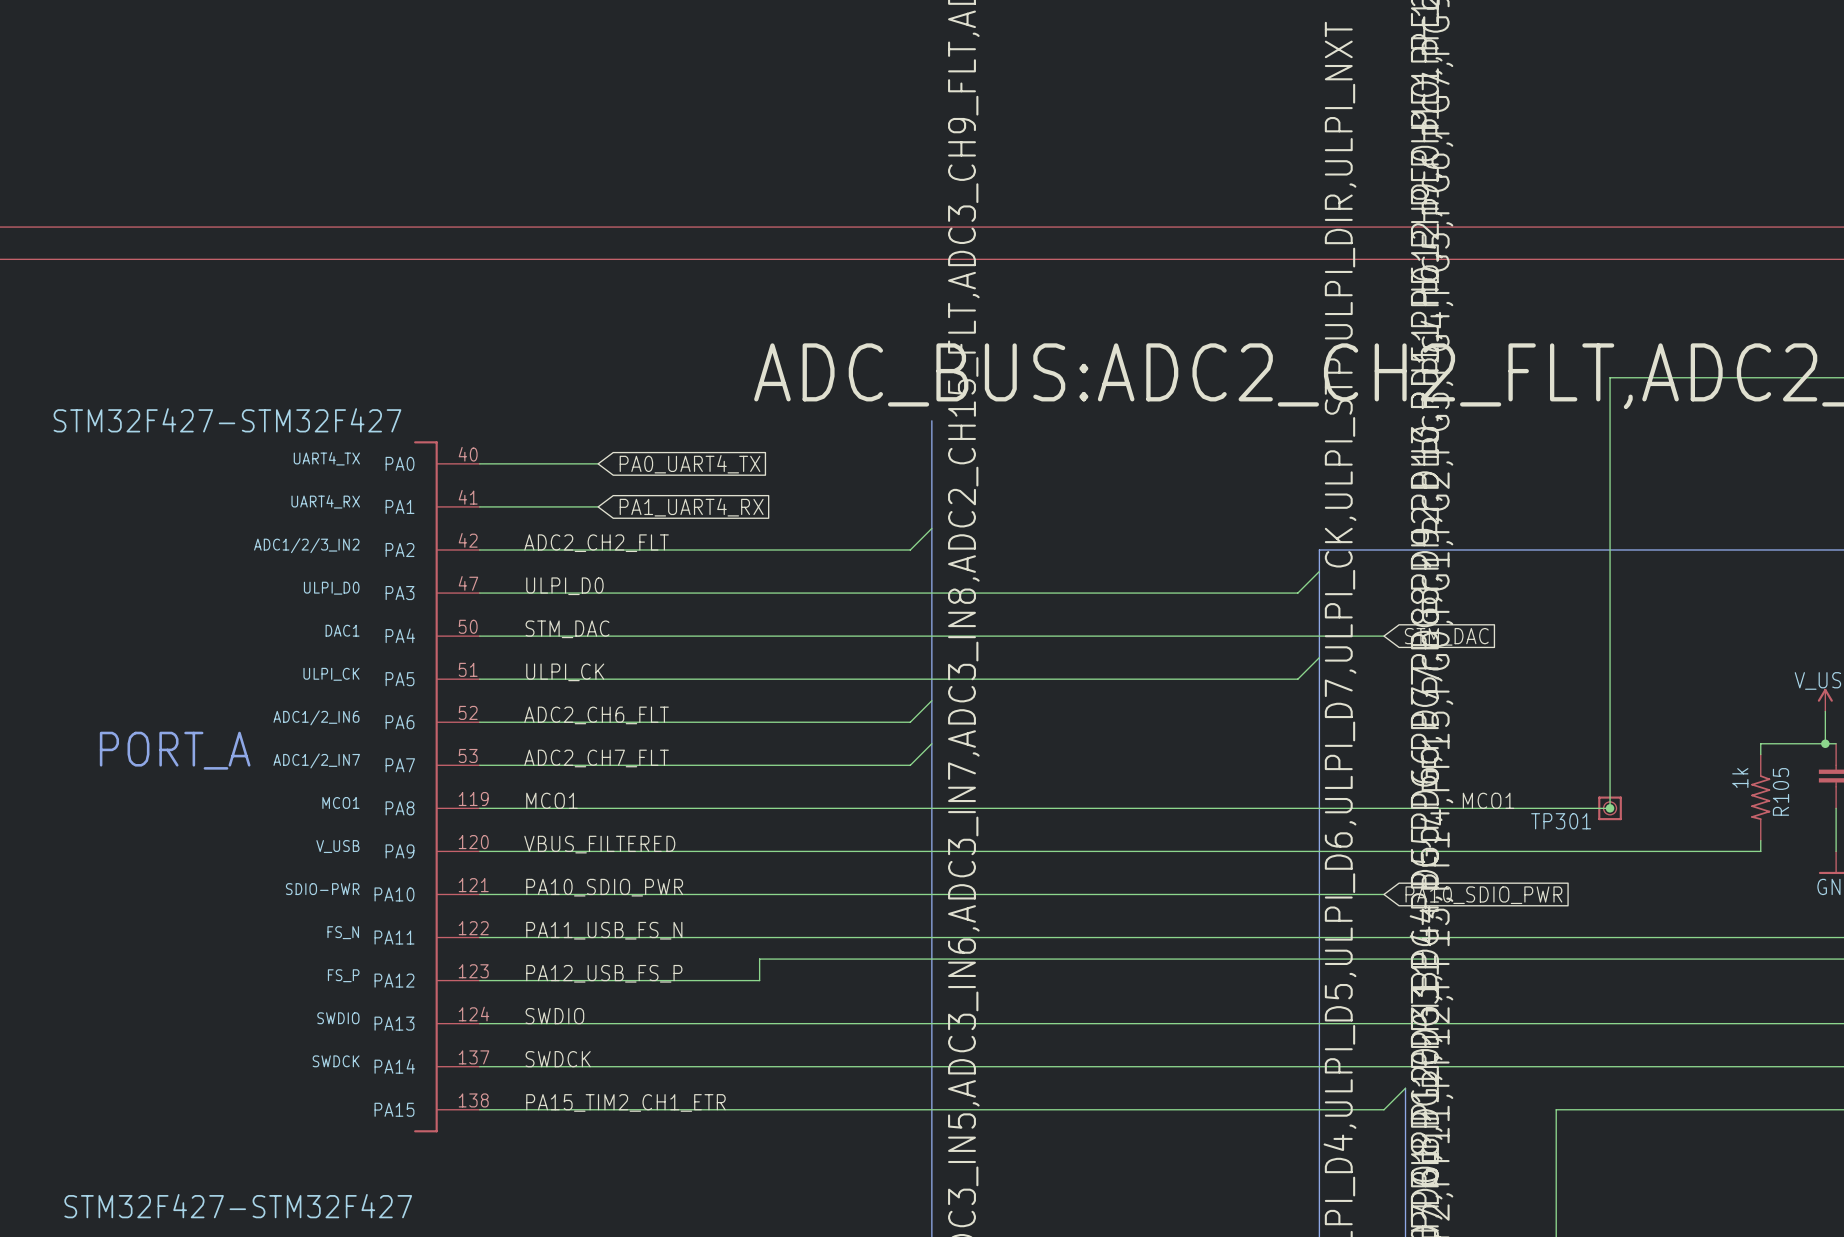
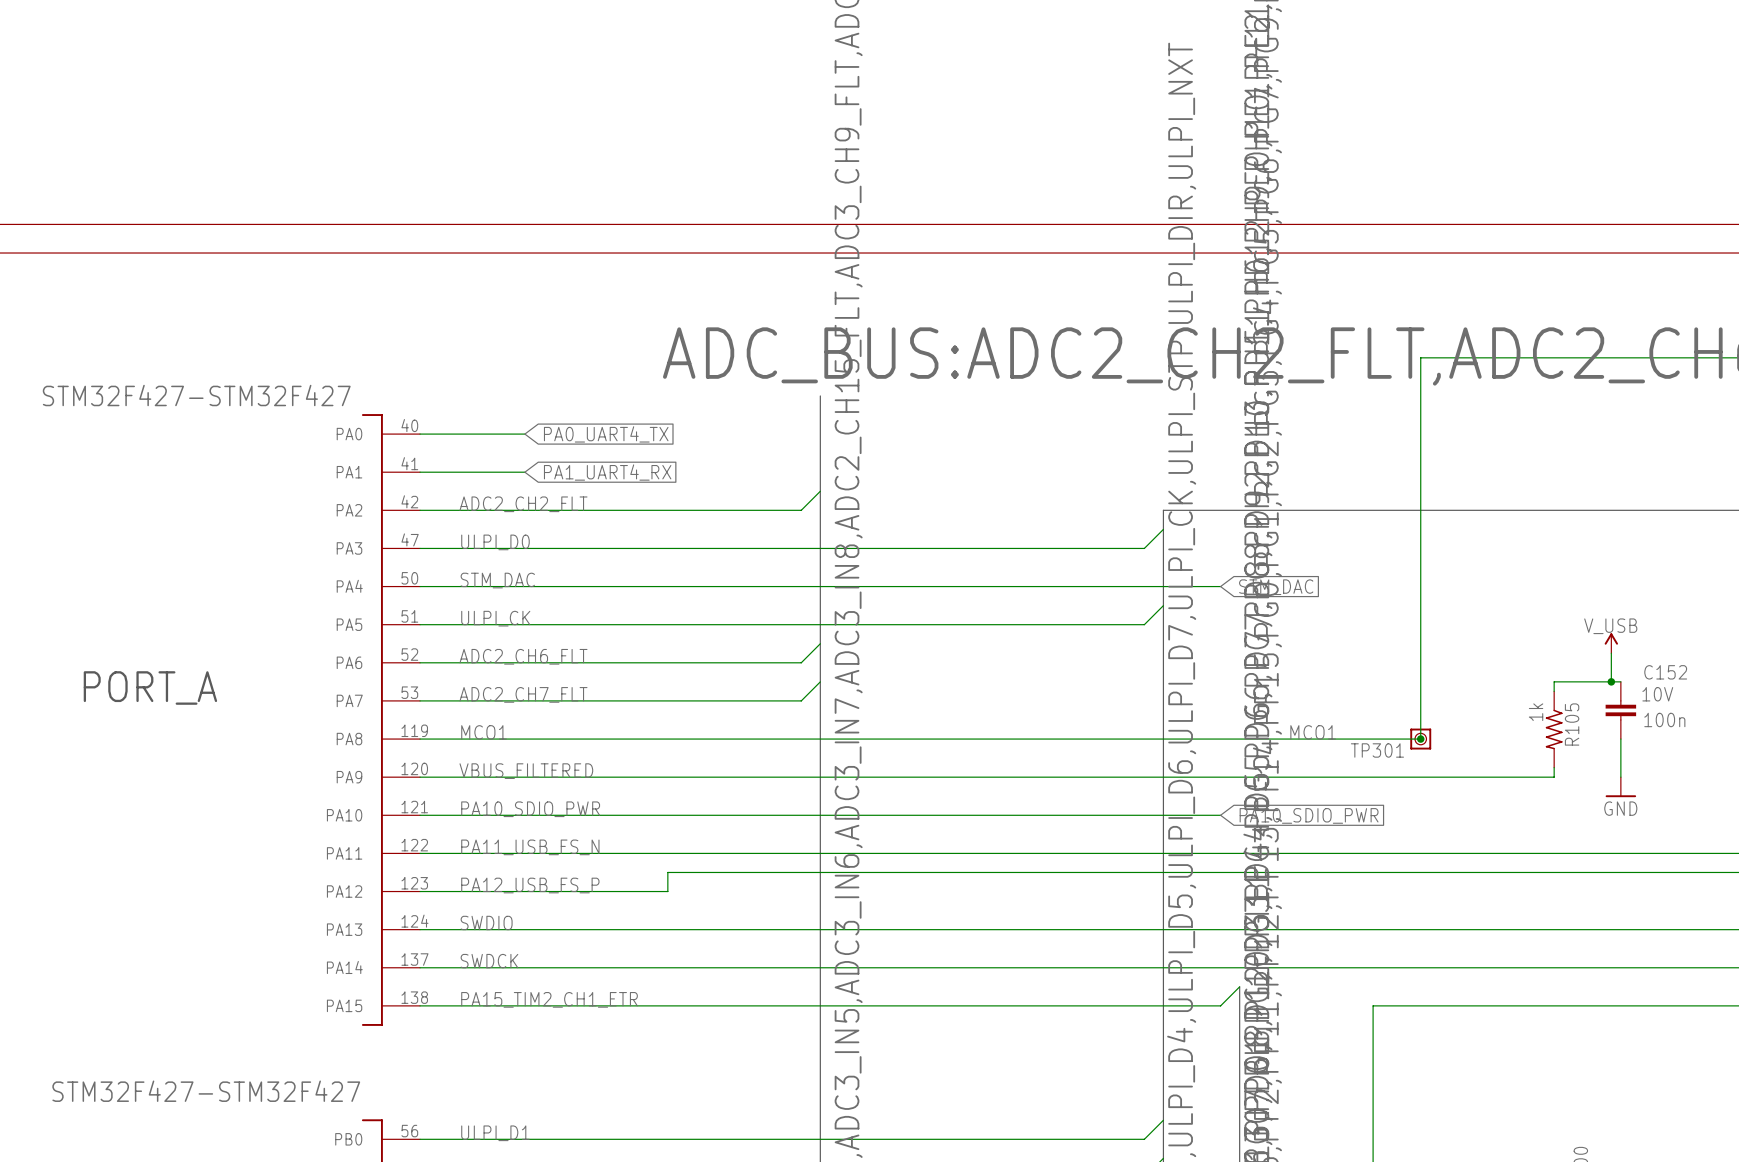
part text: UART4_TX (326, 458) -> none
part text: UART4_RX (325, 501) -> none
part text: ADC1/2/3_IN2 (306, 545) -> none
part text: ULPI_D0 (331, 588) -> none
part text: DAC1 (342, 630) -> none
part text: ULPI_CK (331, 674) -> none
part text: ADC1/2_IN6 (316, 717) -> none
part text: ADC1/2_IN7 (316, 760) -> none
part text: MCO1 (340, 802) -> none
part text: V_USB (337, 846) -> none
part text: SDIO-PWR (322, 889) -> none
part text: FS_N (343, 932) -> none
part text: FS_P (343, 975) -> none
part text: SWDIO (338, 1018) -> none
part text: SWDCK (336, 1061) -> none

